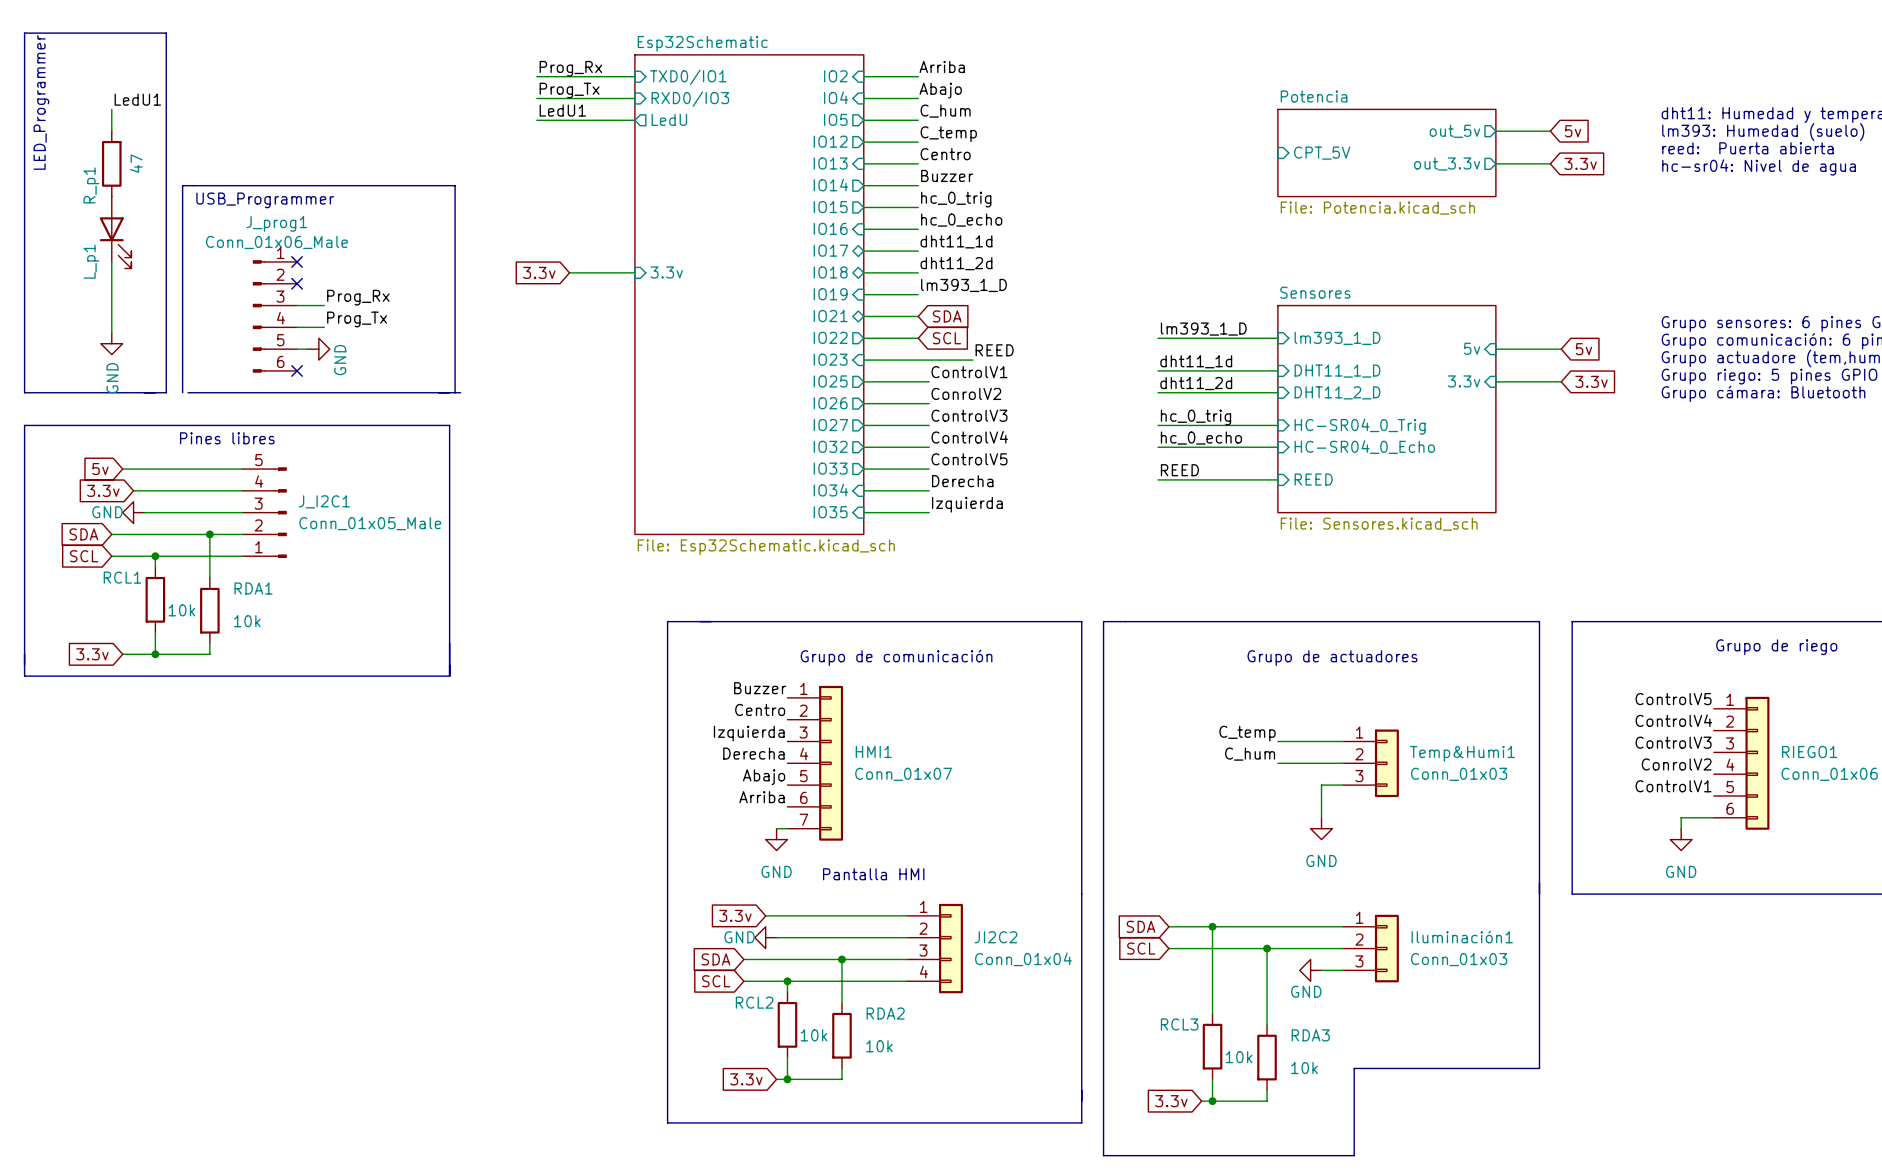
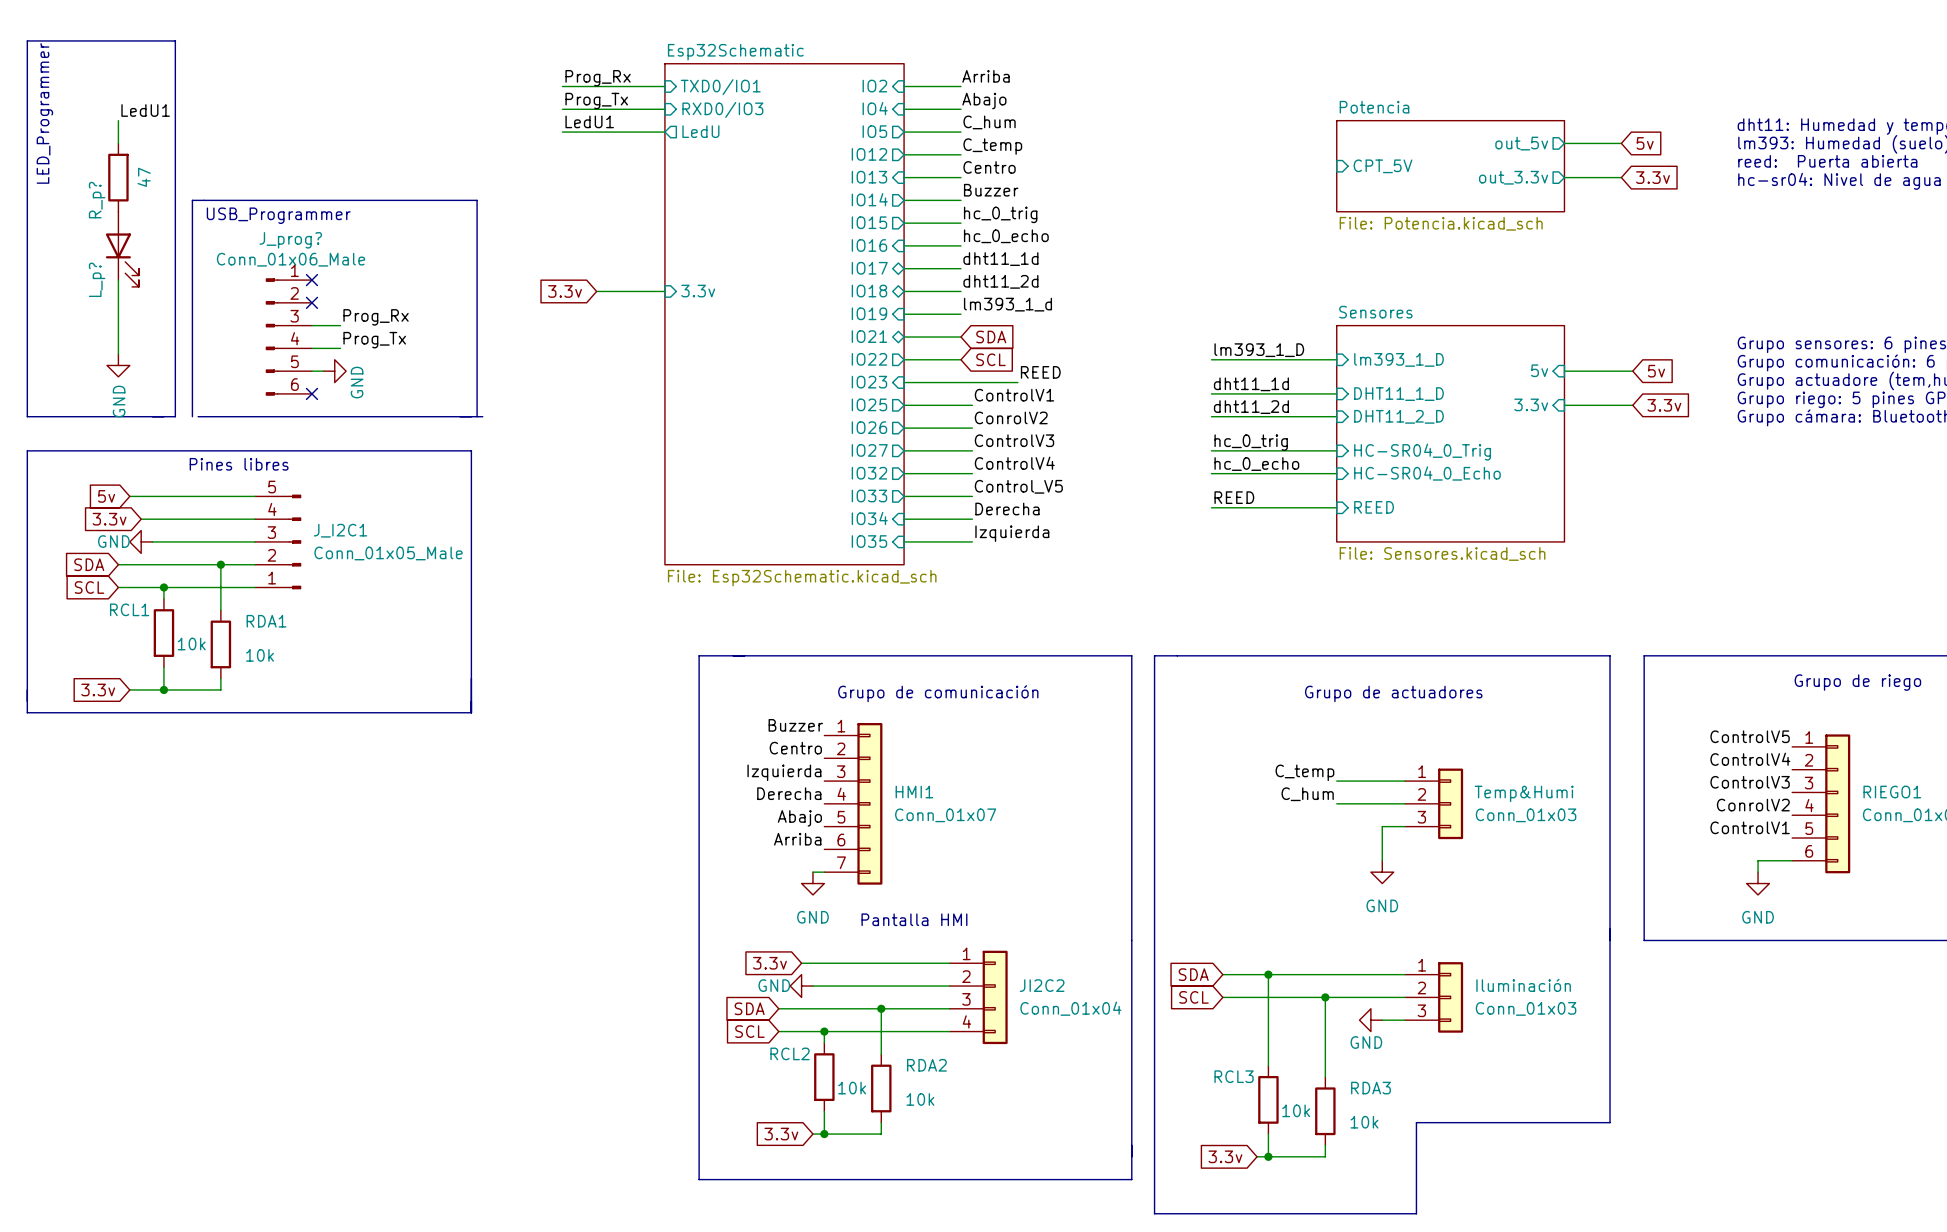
R_p1 name: R_p1 (91, 185) -> R_p? (97, 200)
J_prog1 name: J_prog1 (276, 223) -> J_prog? (290, 240)
L_p1 name: L_p1 (91, 261) -> L_p? (97, 279)
label: lm393_1_D (964, 285) -> lm393_1_d (1007, 304)
label: ControlV5 (969, 459) -> Control_V5 (1018, 486)
Temp&Humi1 name: Temp&Humi1 (1462, 753) -> Temp&Humi (1524, 793)
Iluminación1 name: Iluminación1 (1462, 937) -> Iluminación (1523, 985)

